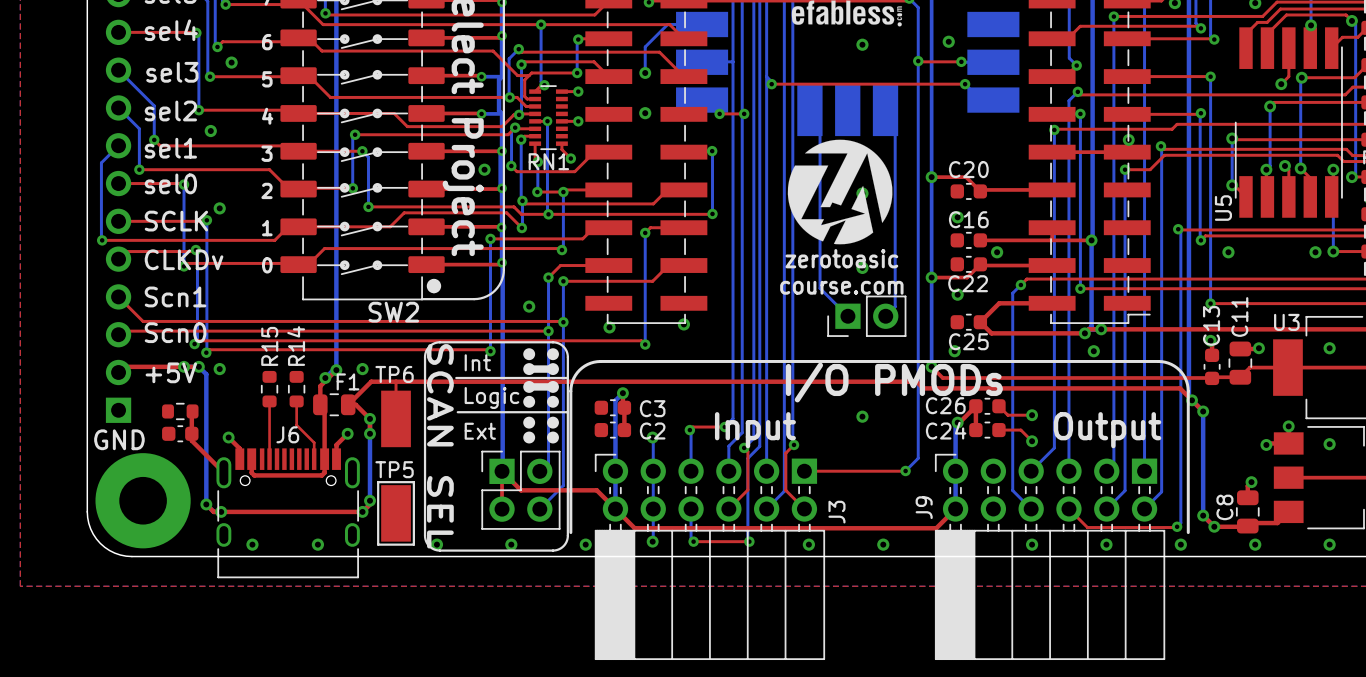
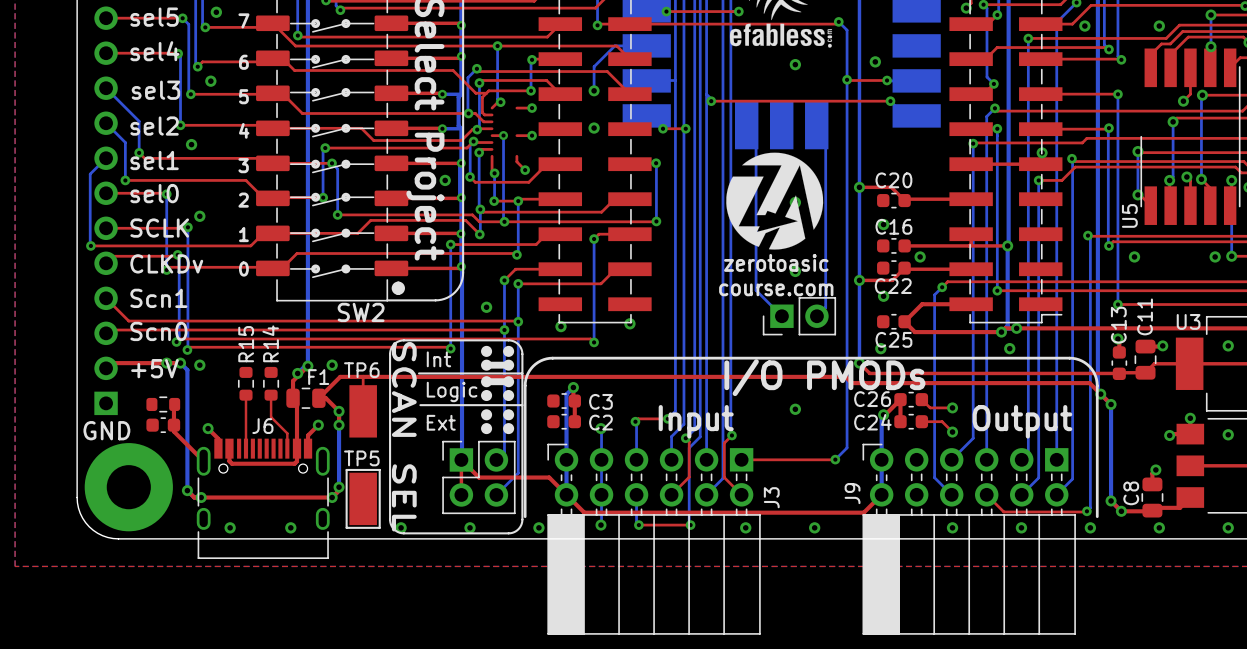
RN1: (548, 117) -> none

